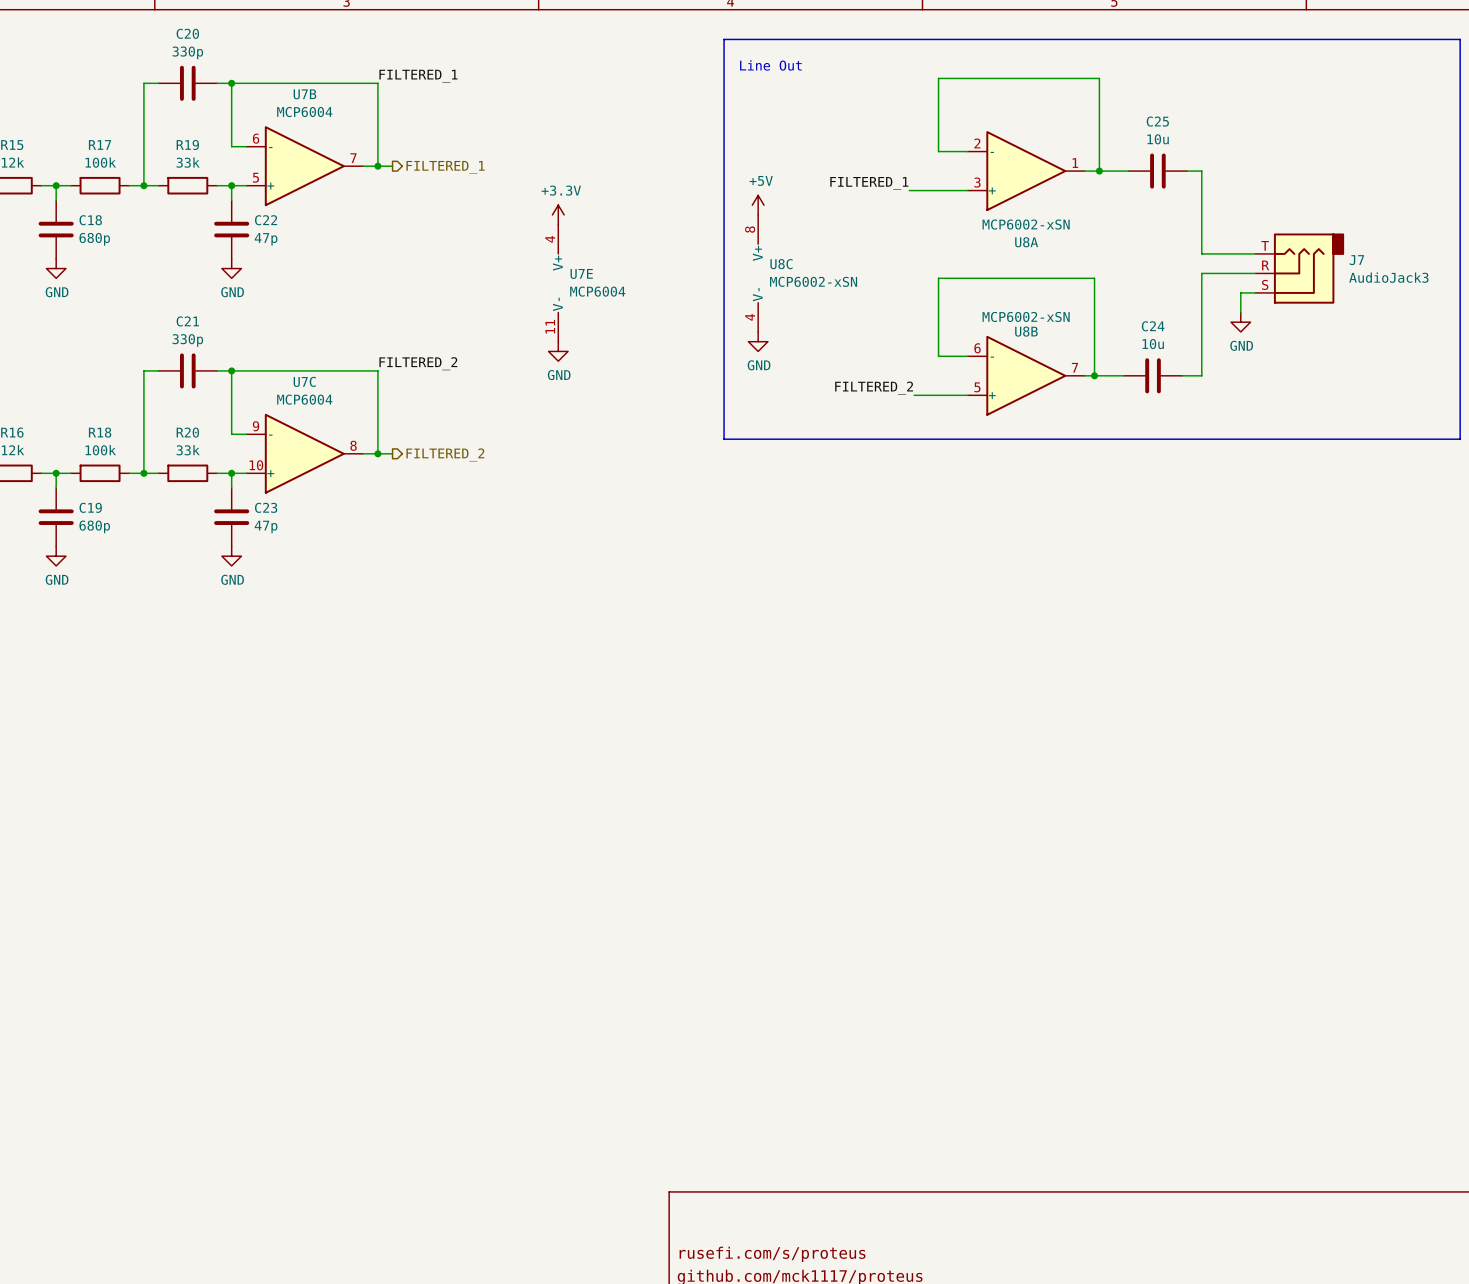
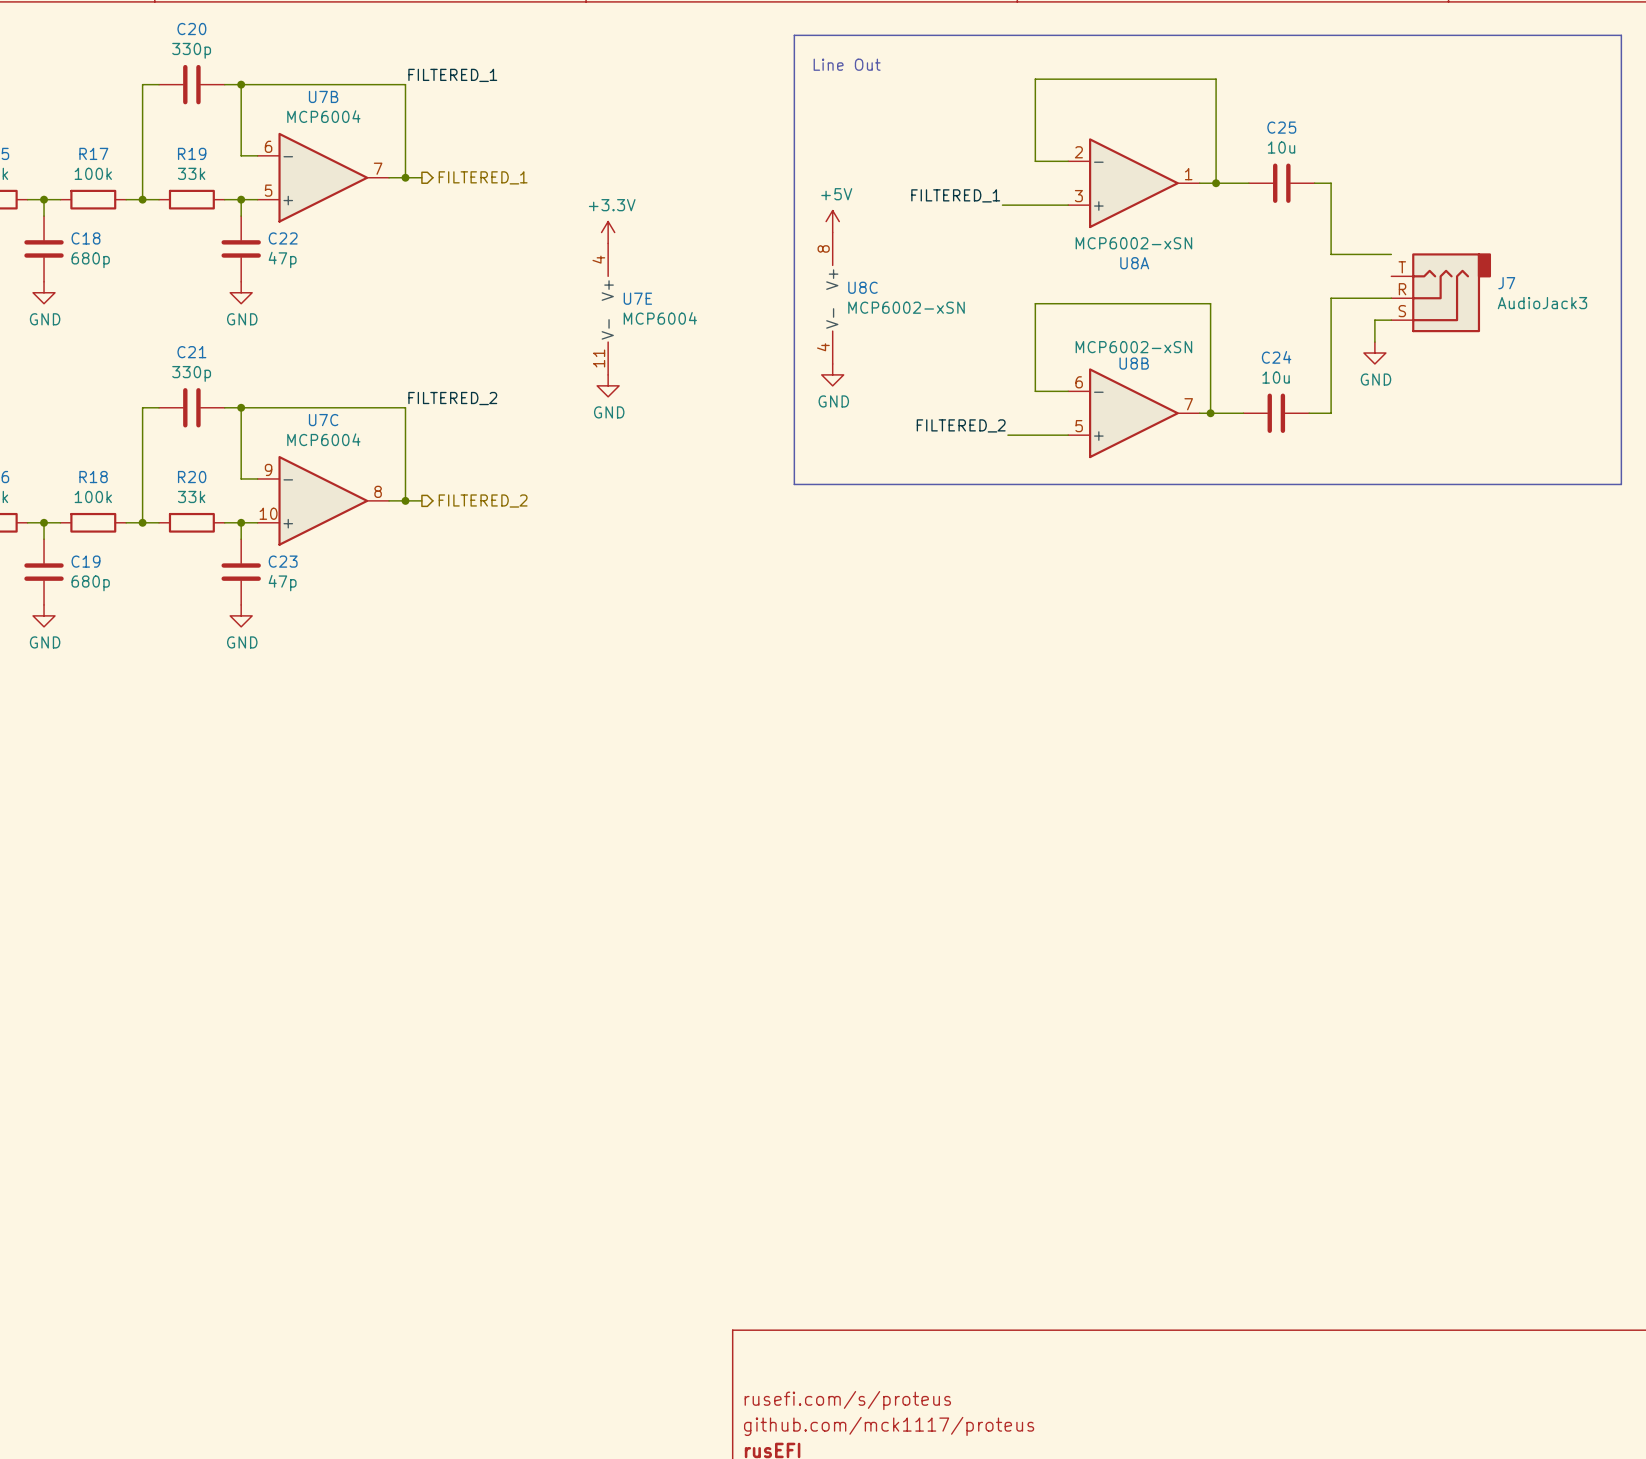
wire: (1201, 234) (1201, 253) (1255, 253) -> (1331, 254) (1391, 254)

